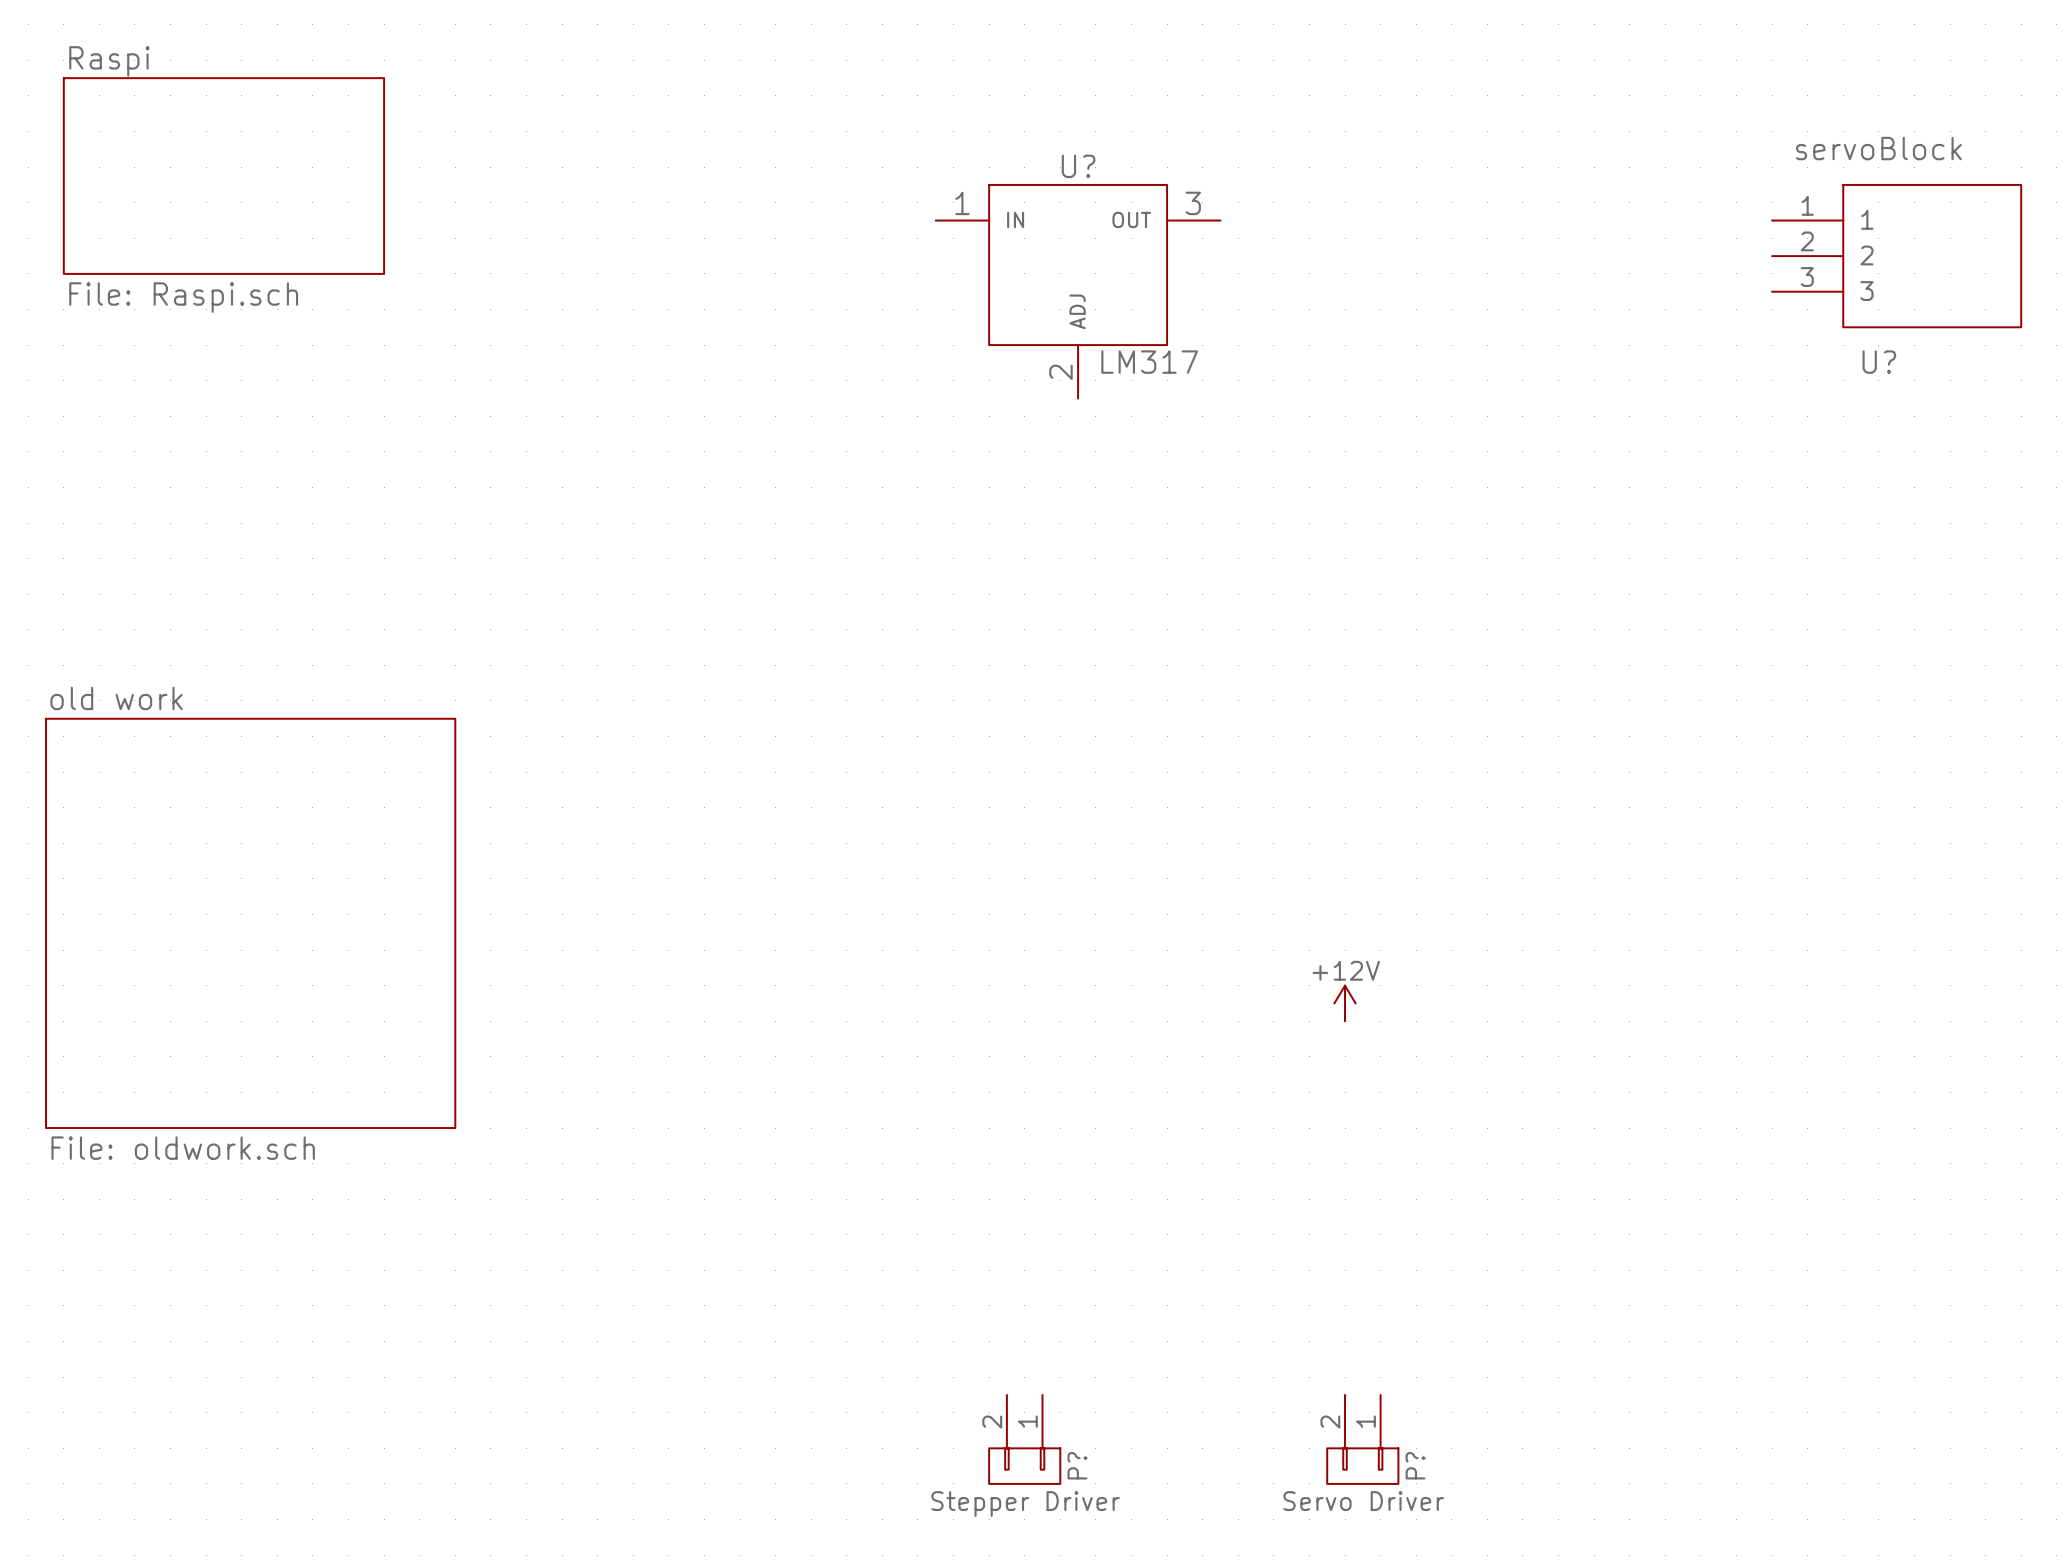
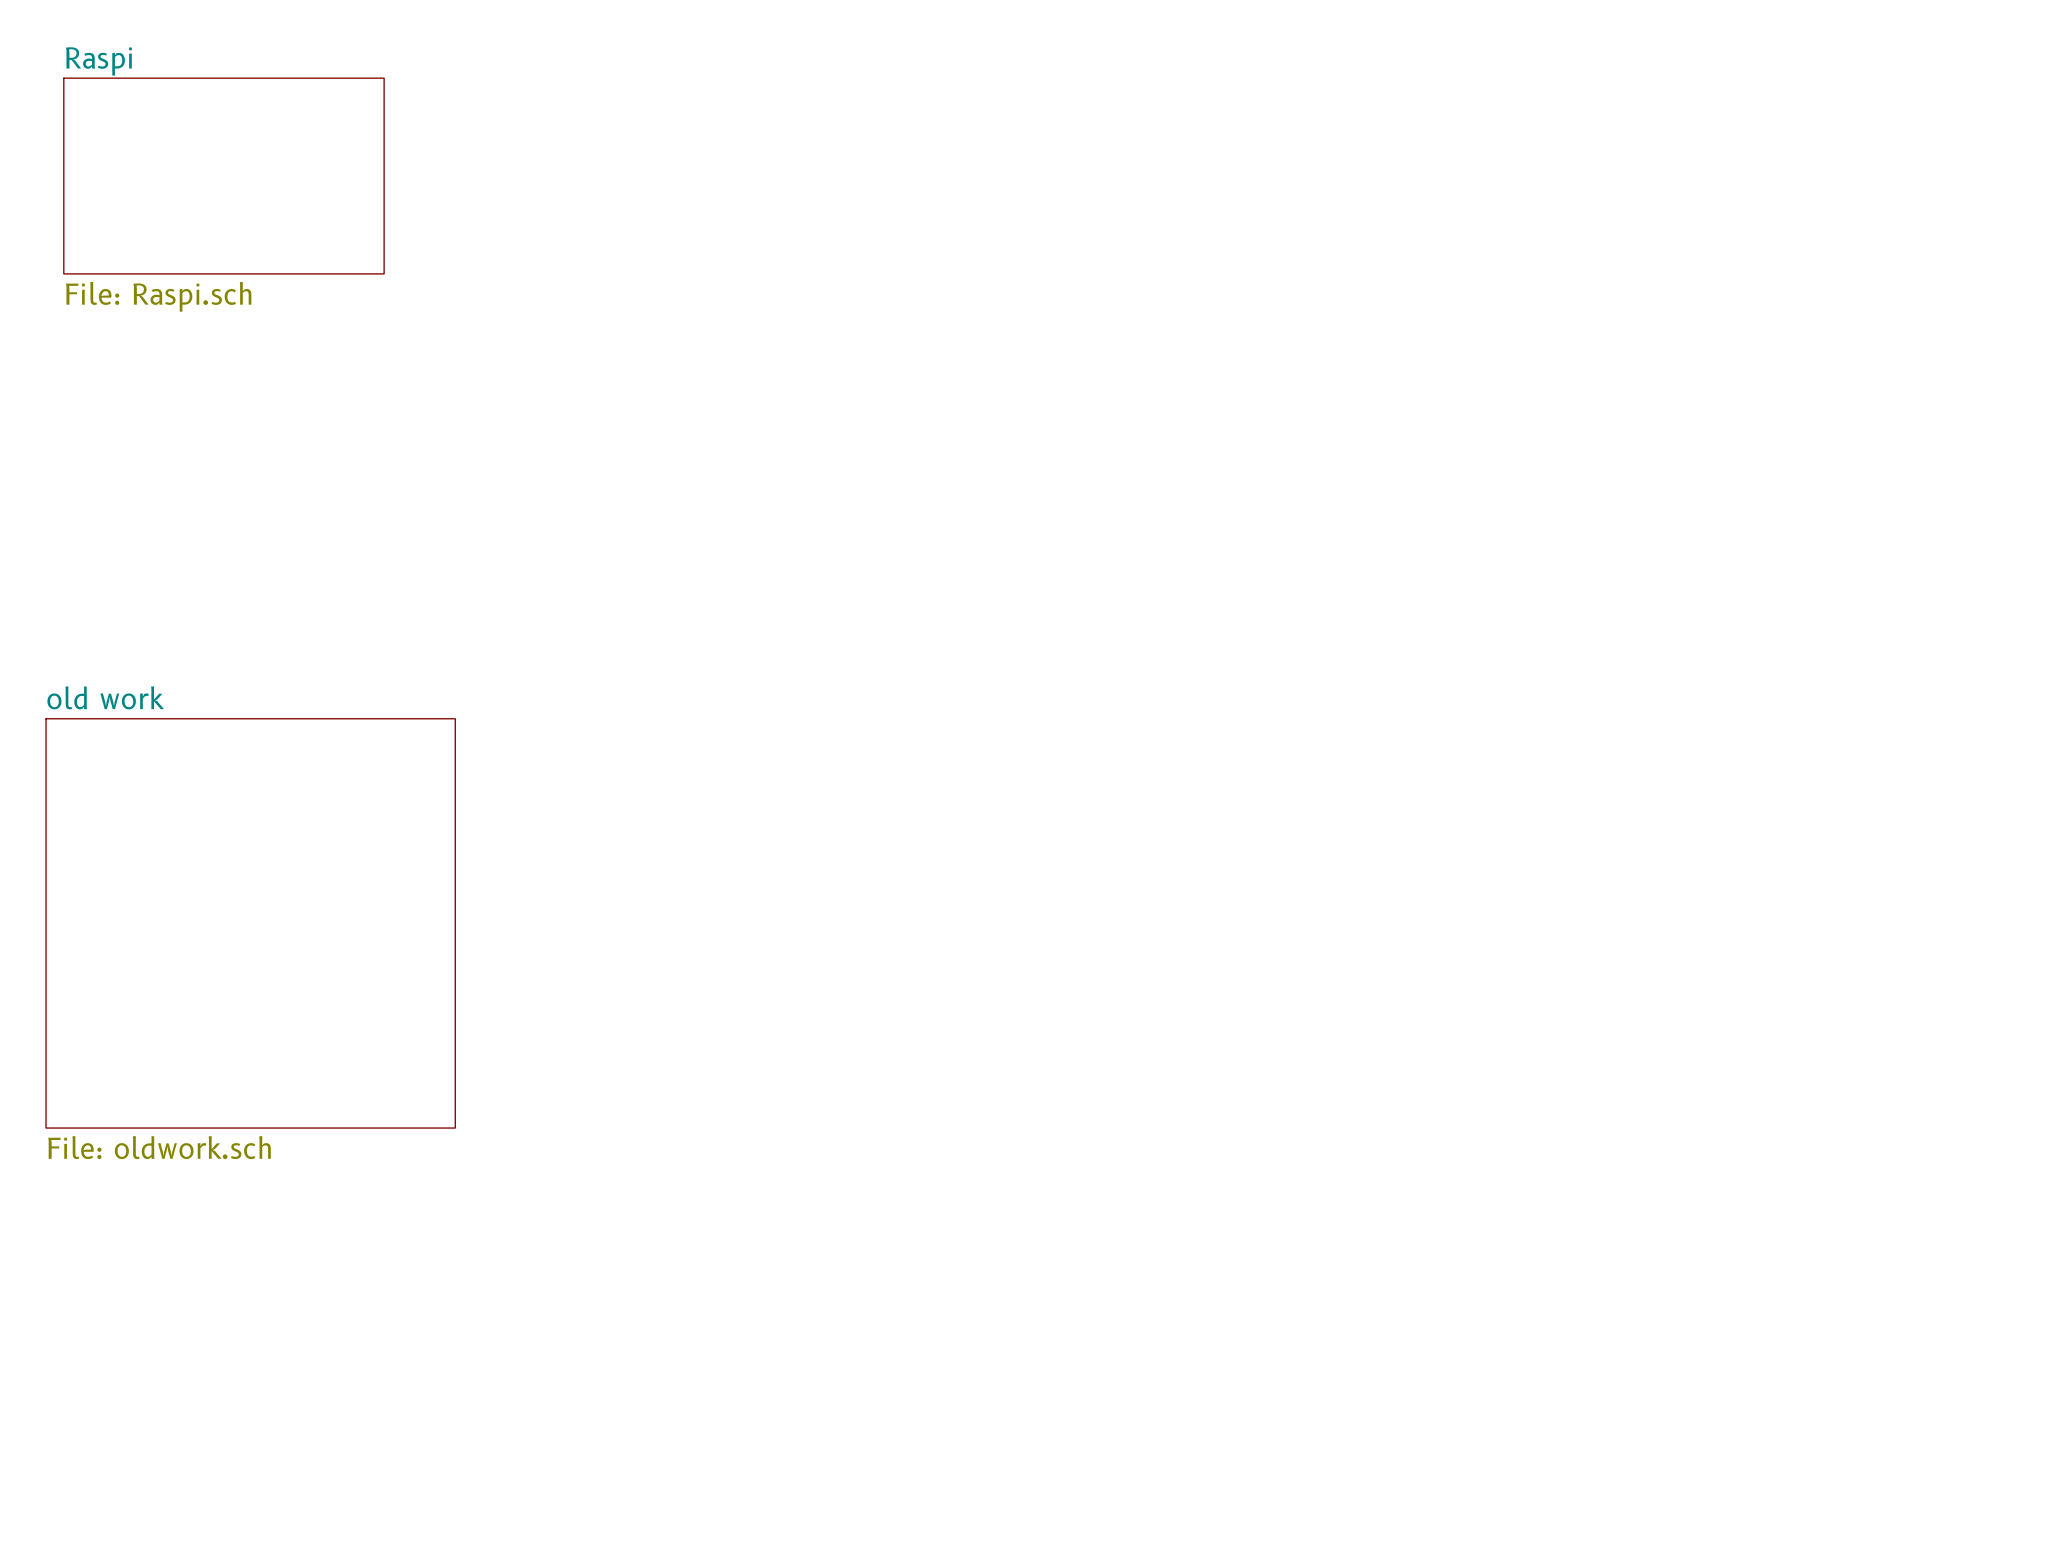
U?: servoBlock (1896, 256) -> none
U?: LM317 (1078, 291) -> none
power symbol: +12V (1345, 1003) -> none
P?: Stepper Driver (1024, 1439) -> none
P?: Servo Driver (1362, 1439) -> none

